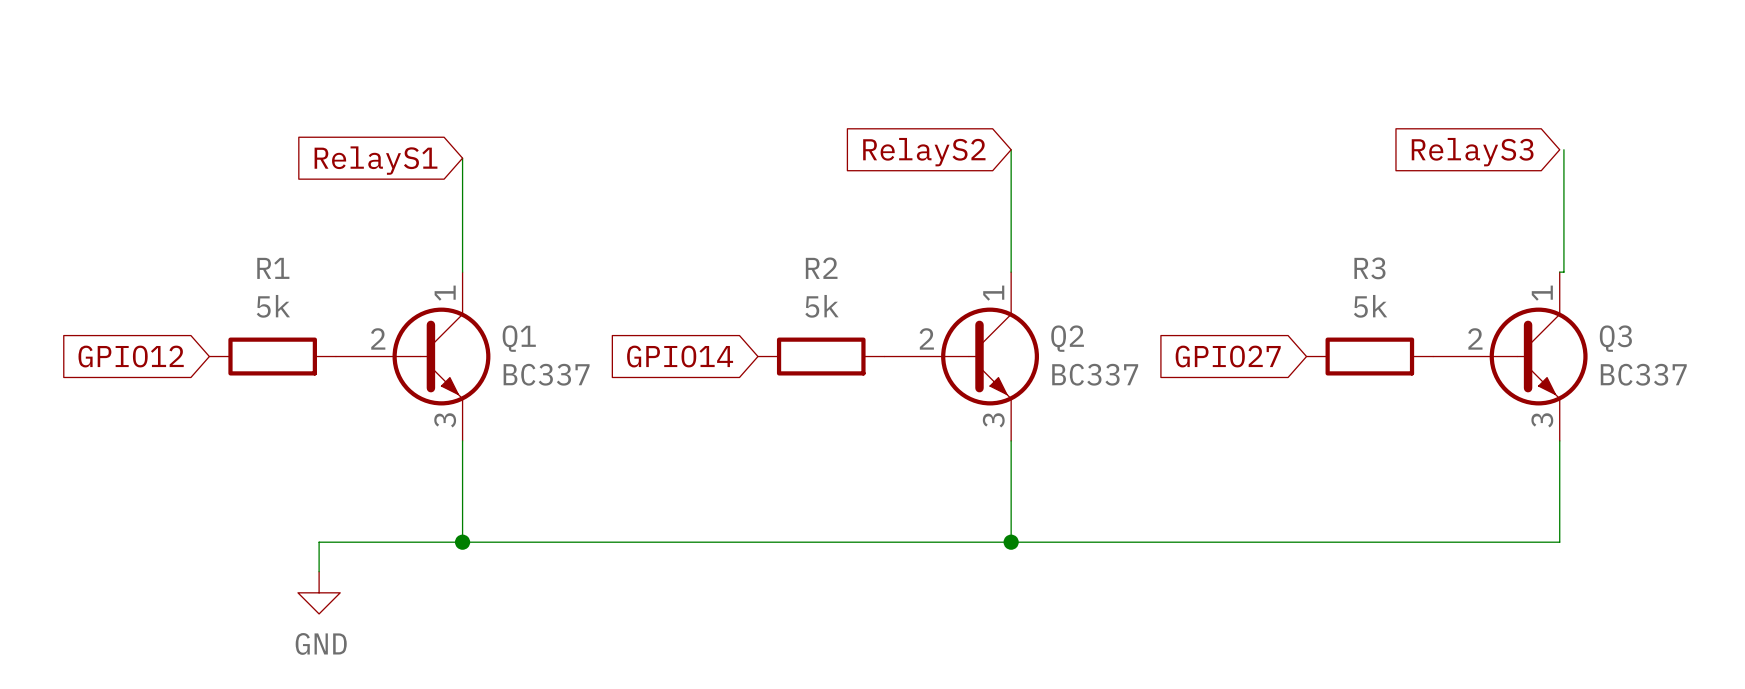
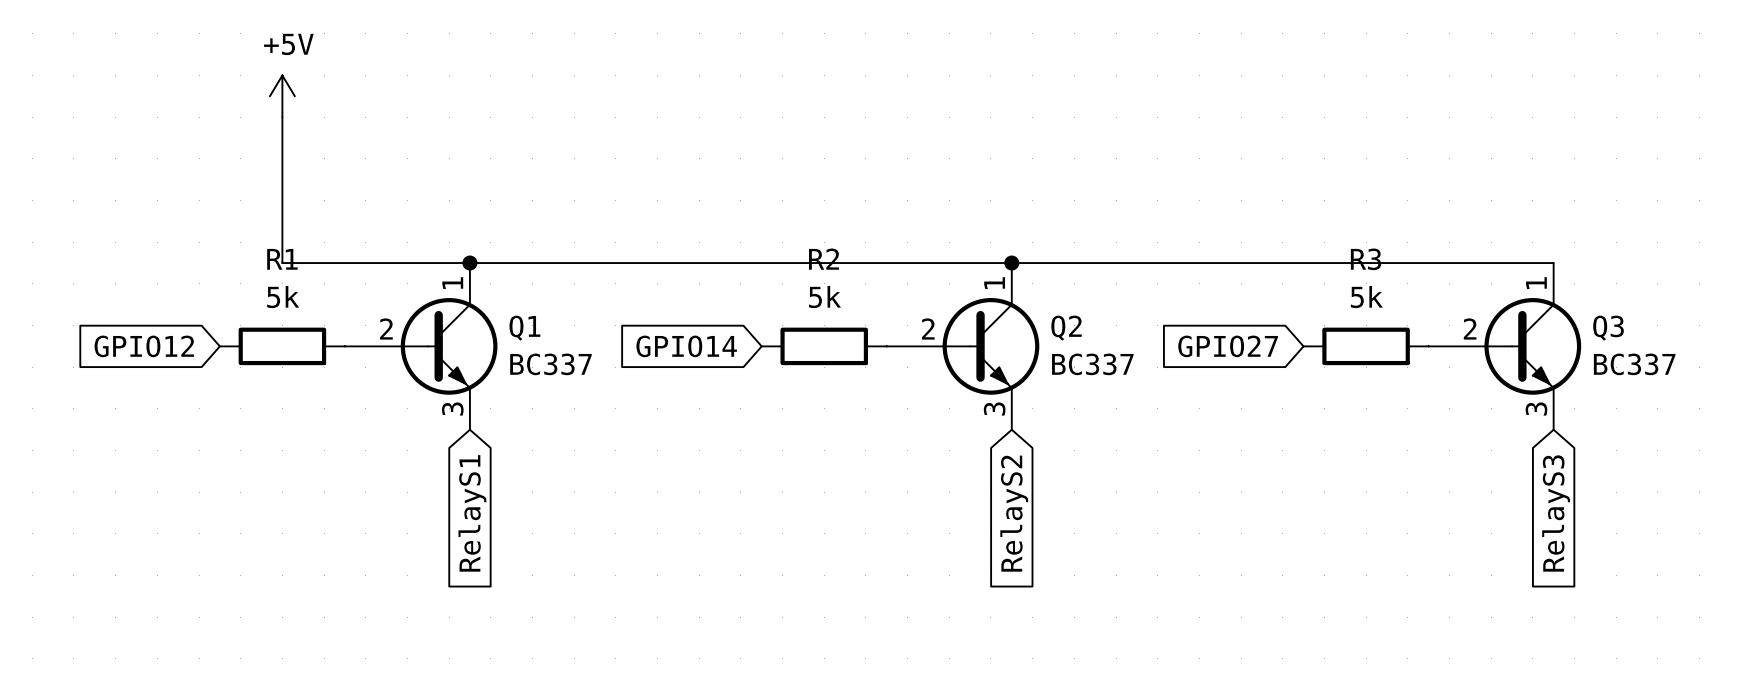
power symbol: none -> +5V (282, 96)
wire: (1011, 149) (1011, 272) -> none
wire: (1563, 149) (1563, 272) (1559, 272) -> (282, 117) (282, 263) (1553, 263)
global label rotation: 0° (924, 152) -> 90° counterclockwise (1014, 513)
global label position: RelayS2 (924, 152) -> RelayS2 (1014, 513)
global label rotation: 0° (1472, 152) -> 90° counterclockwise (1556, 513)
global label position: RelayS3 (1472, 152) -> RelayS3 (1556, 513)
wire: (462, 158) (462, 272) -> none
global label rotation: 0° (376, 160) -> 90° counterclockwise (472, 513)
global label position: RelayS1 (376, 160) -> RelayS1 (472, 513)
junction: none -> (469, 263)
junction: none -> (1011, 263)
wire: (462, 440) (462, 542) -> none
wire: (1011, 440) (1011, 542) -> none
wire: (1559, 440) (1559, 542) (319, 542) (319, 571) -> none
junction: (462, 542) -> none
junction: (1011, 542) -> none
power symbol: GND (319, 592) -> none

